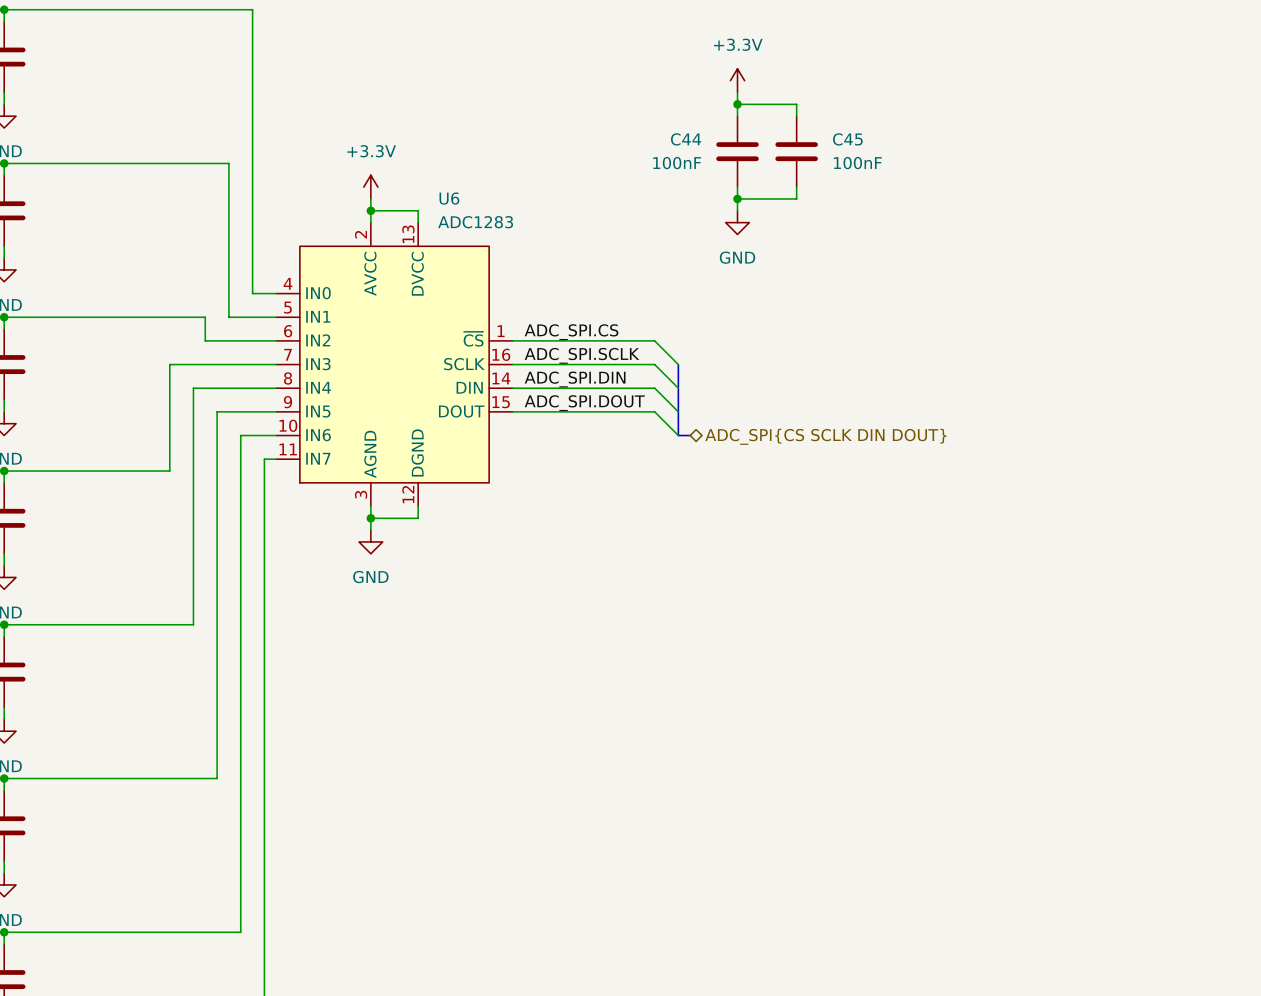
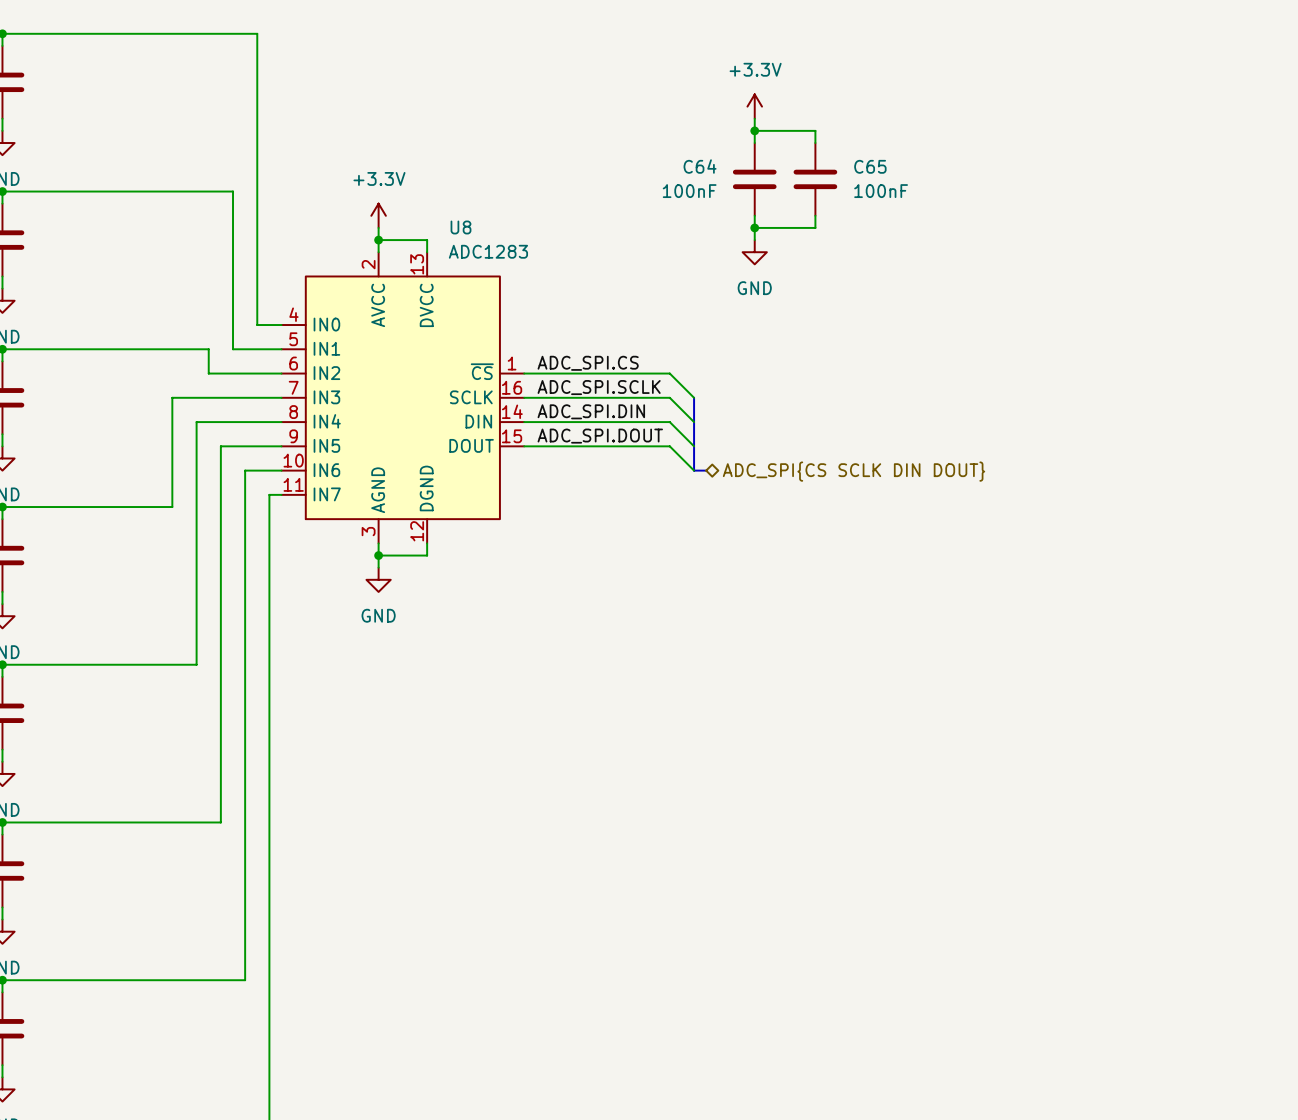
C44 name: C44 (686, 139) -> C64 (700, 166)
C45 name: C45 (847, 139) -> C65 (870, 166)
U6 name: U6 (449, 198) -> U8 (460, 227)

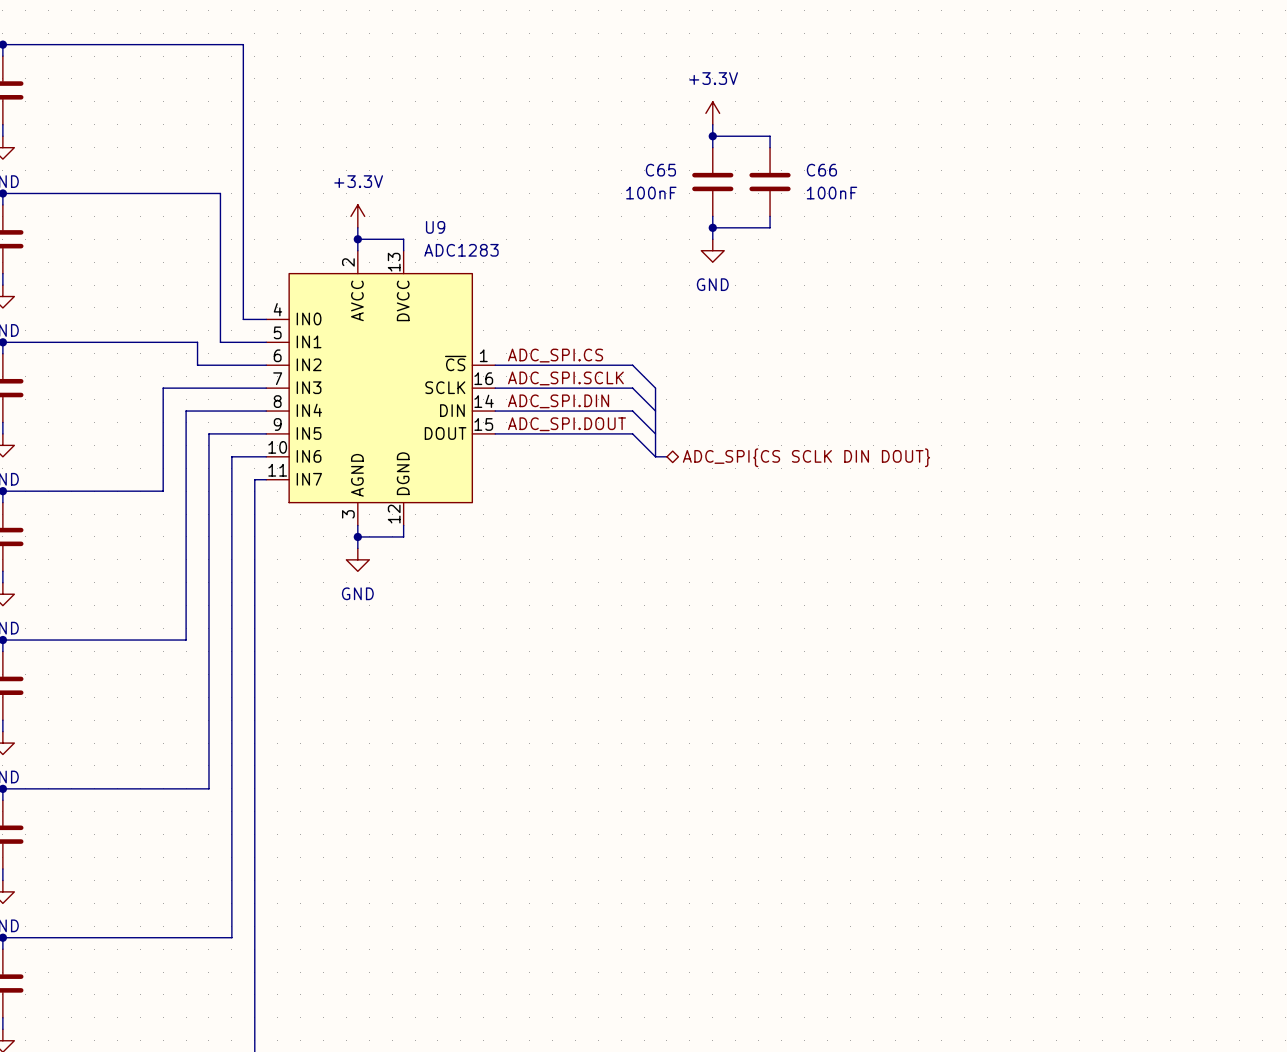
C64 name: C64 (700, 166) -> C65 (660, 170)
C65 name: C65 (870, 166) -> C66 (821, 170)
U8 name: U8 (460, 227) -> U9 (435, 227)

